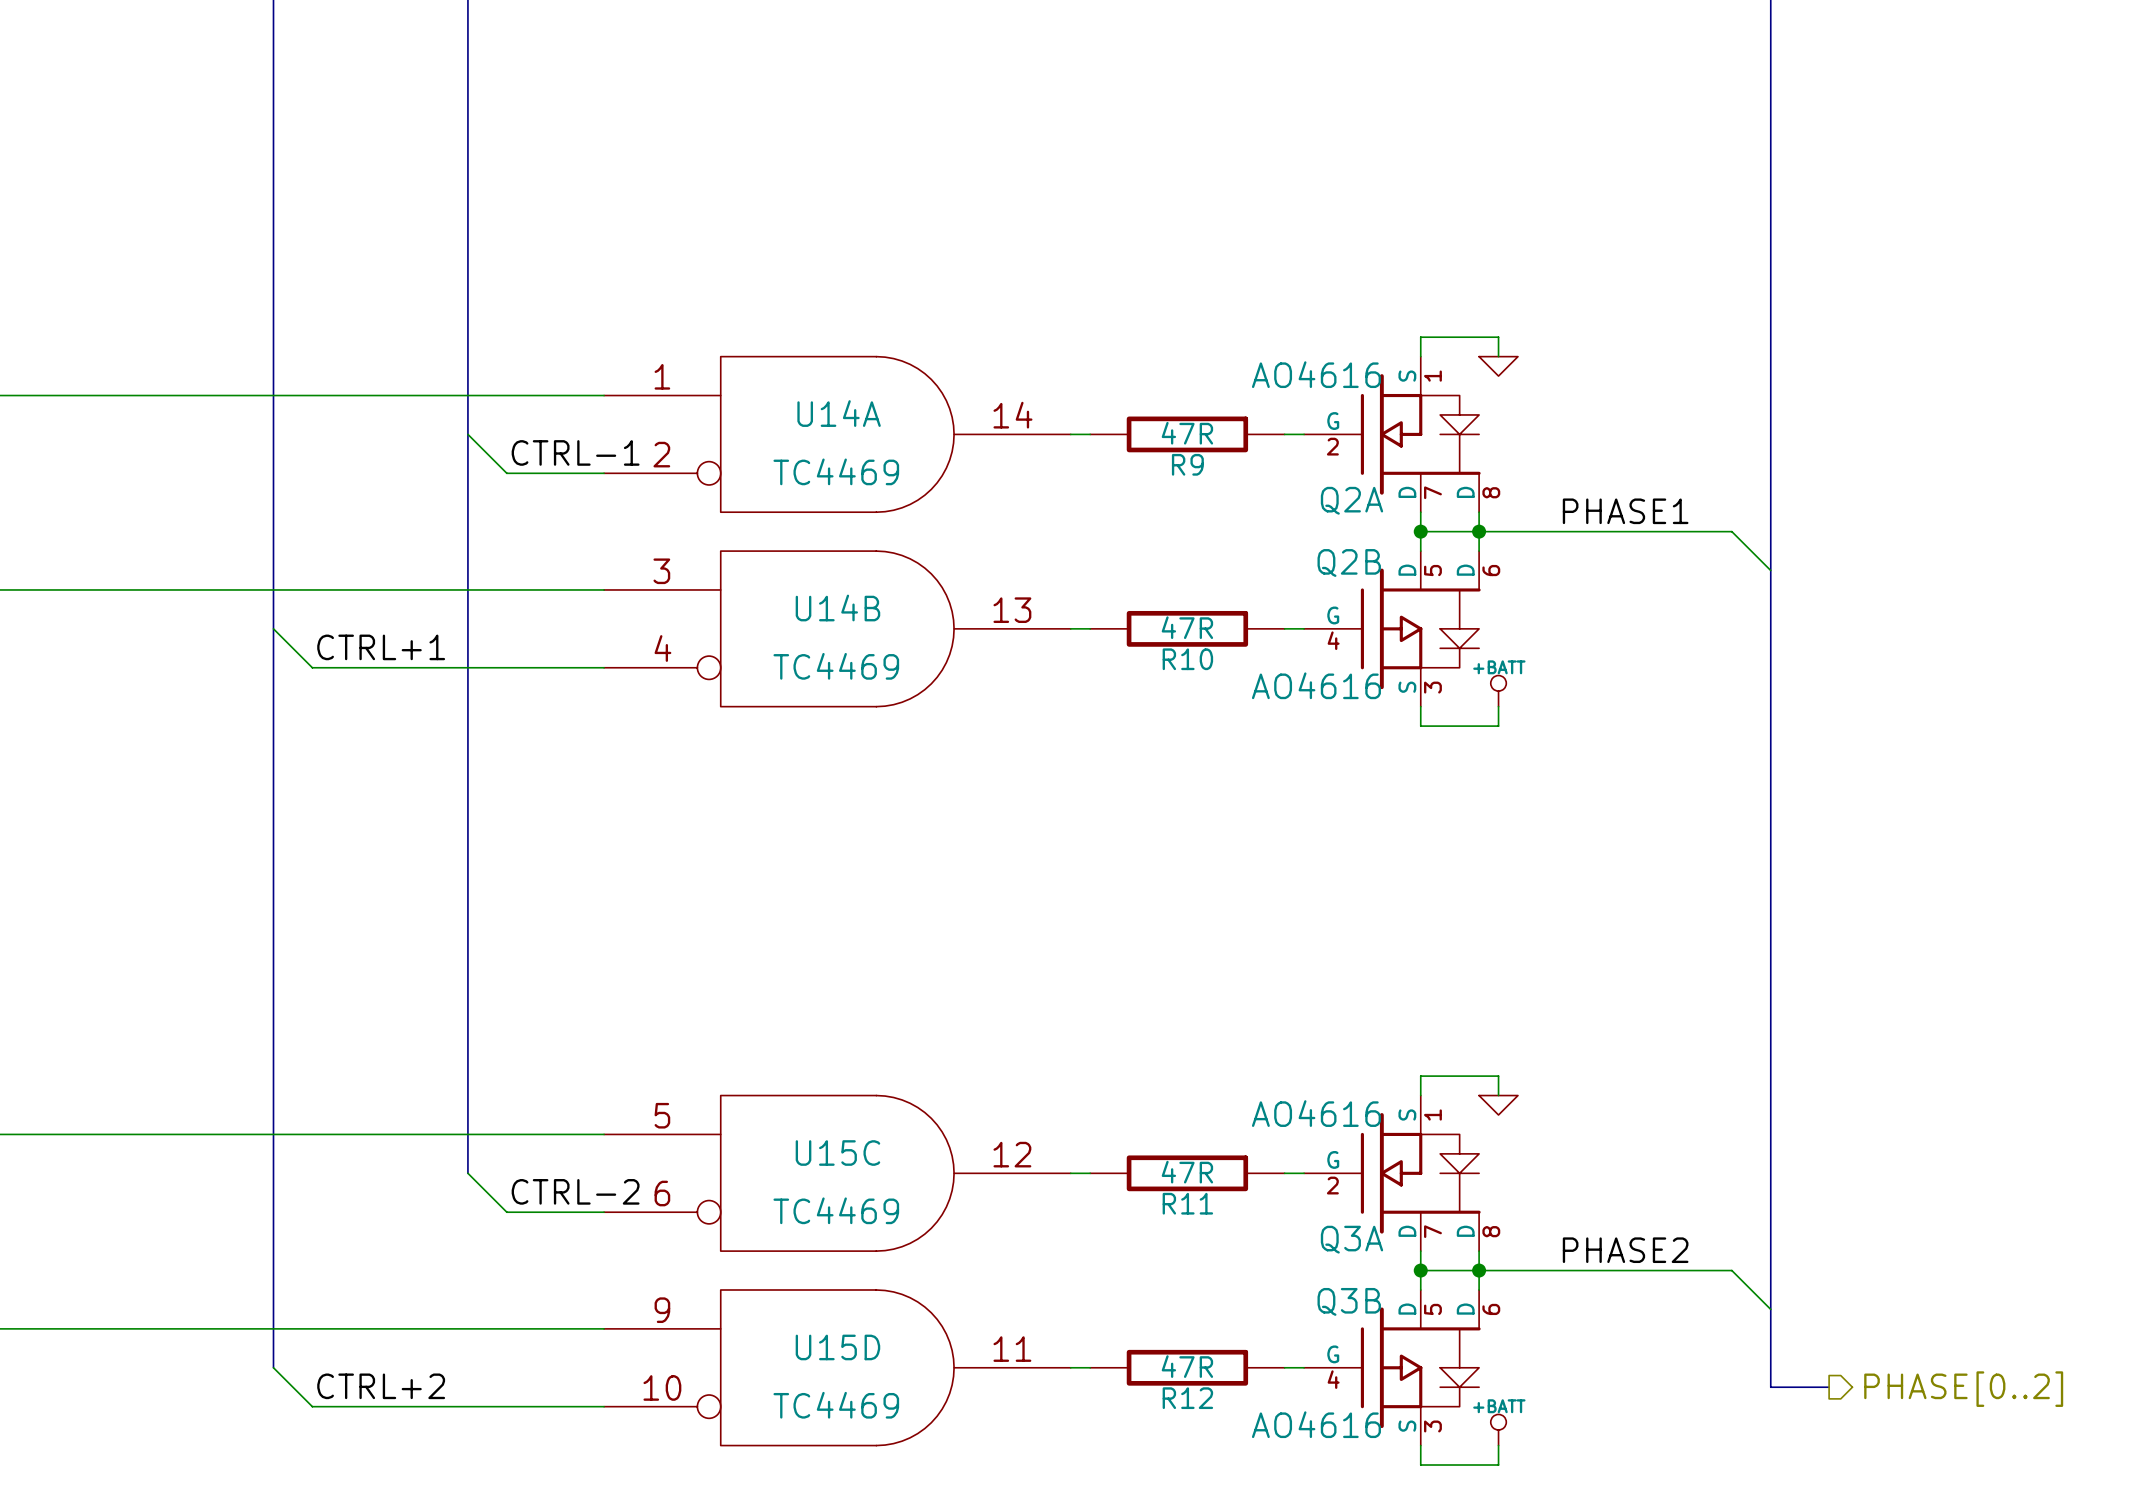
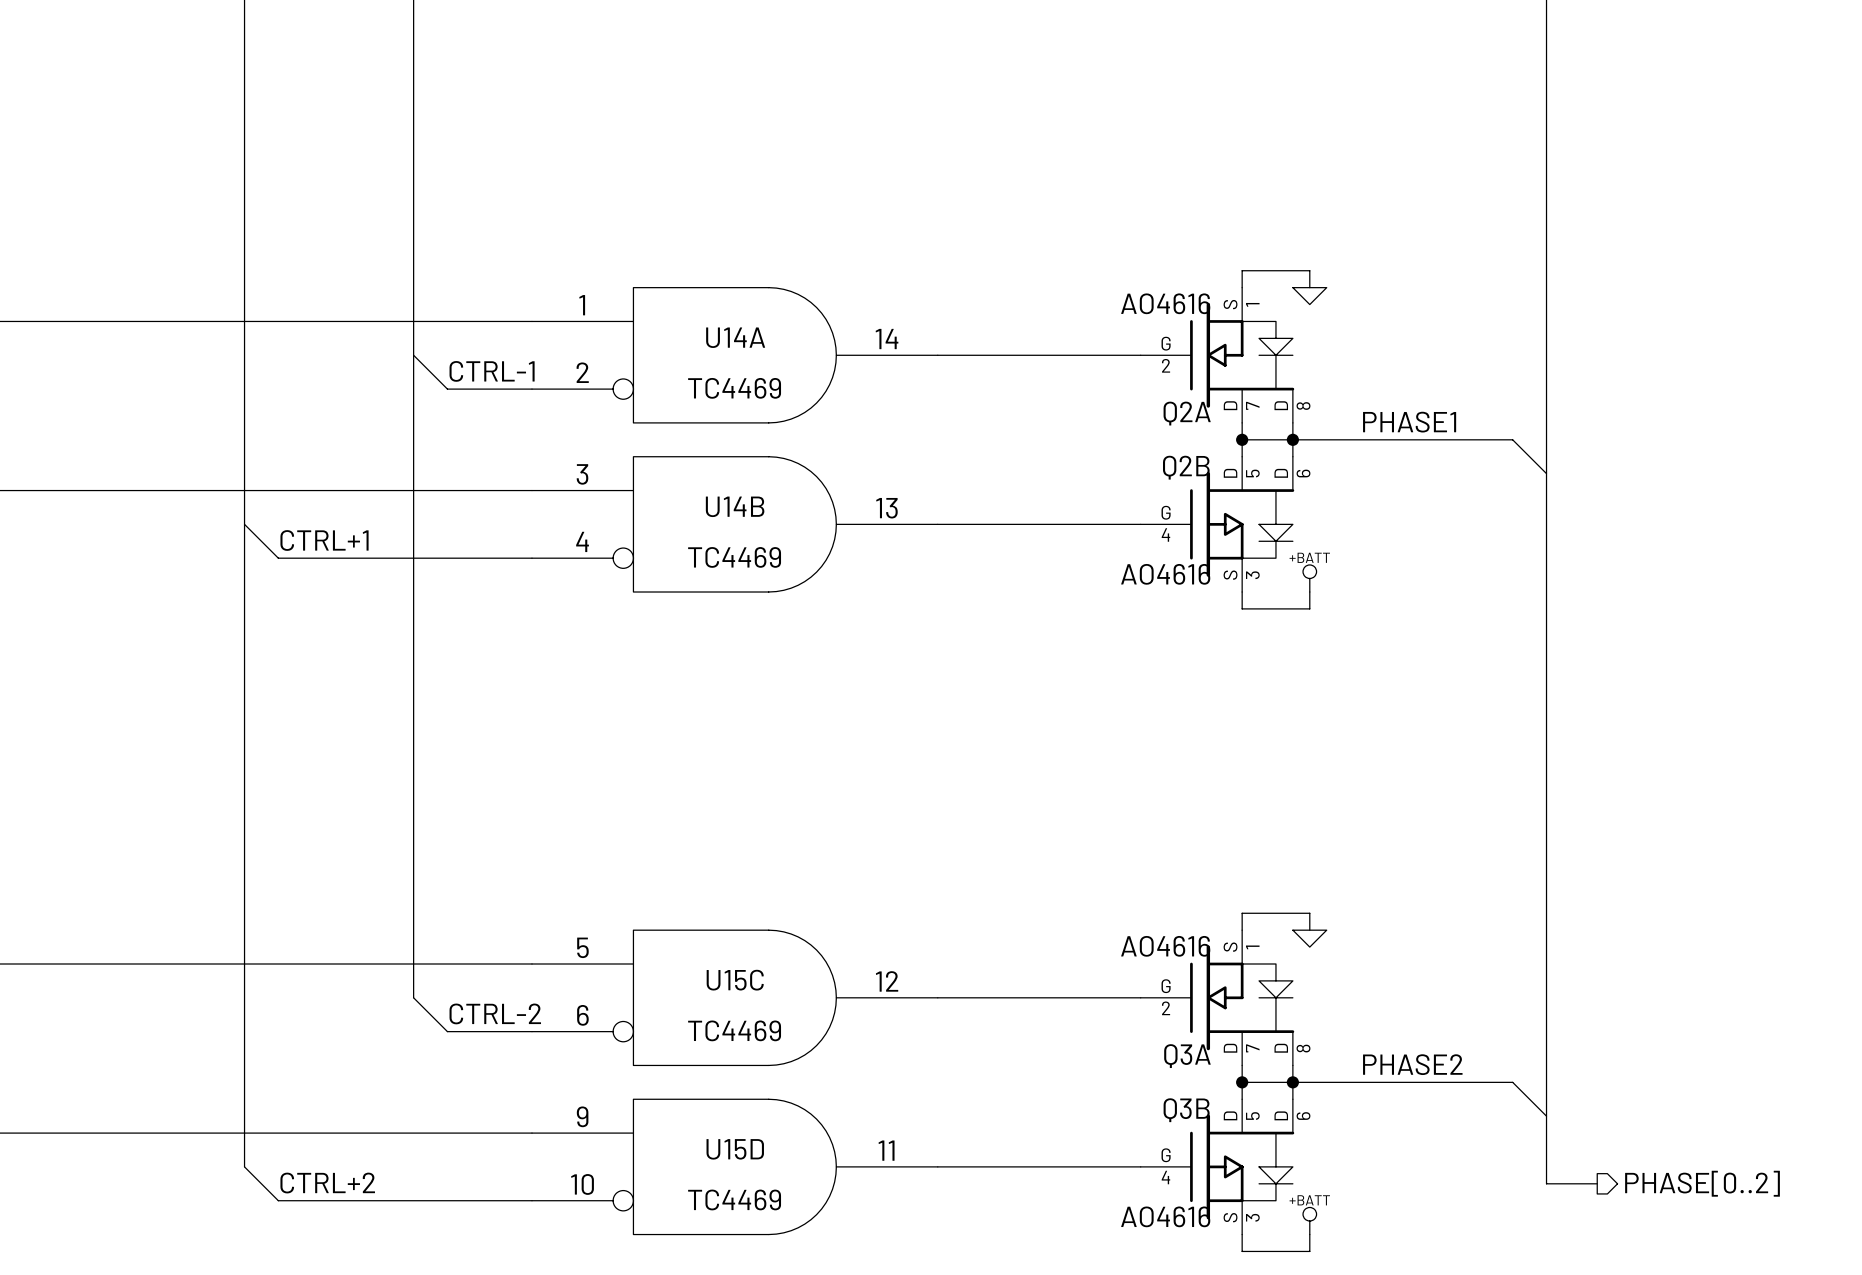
wire: none -> (954, 355) (1123, 355)
R9: 47R (1187, 434) -> none
wire: none -> (954, 524) (1123, 524)
R10: 47R (1187, 628) -> none
wire: none -> (954, 997) (1123, 997)
R11: 47R (1187, 1173) -> none
wire: none -> (954, 1166) (1123, 1166)
R12: 47R (1187, 1367) -> none

